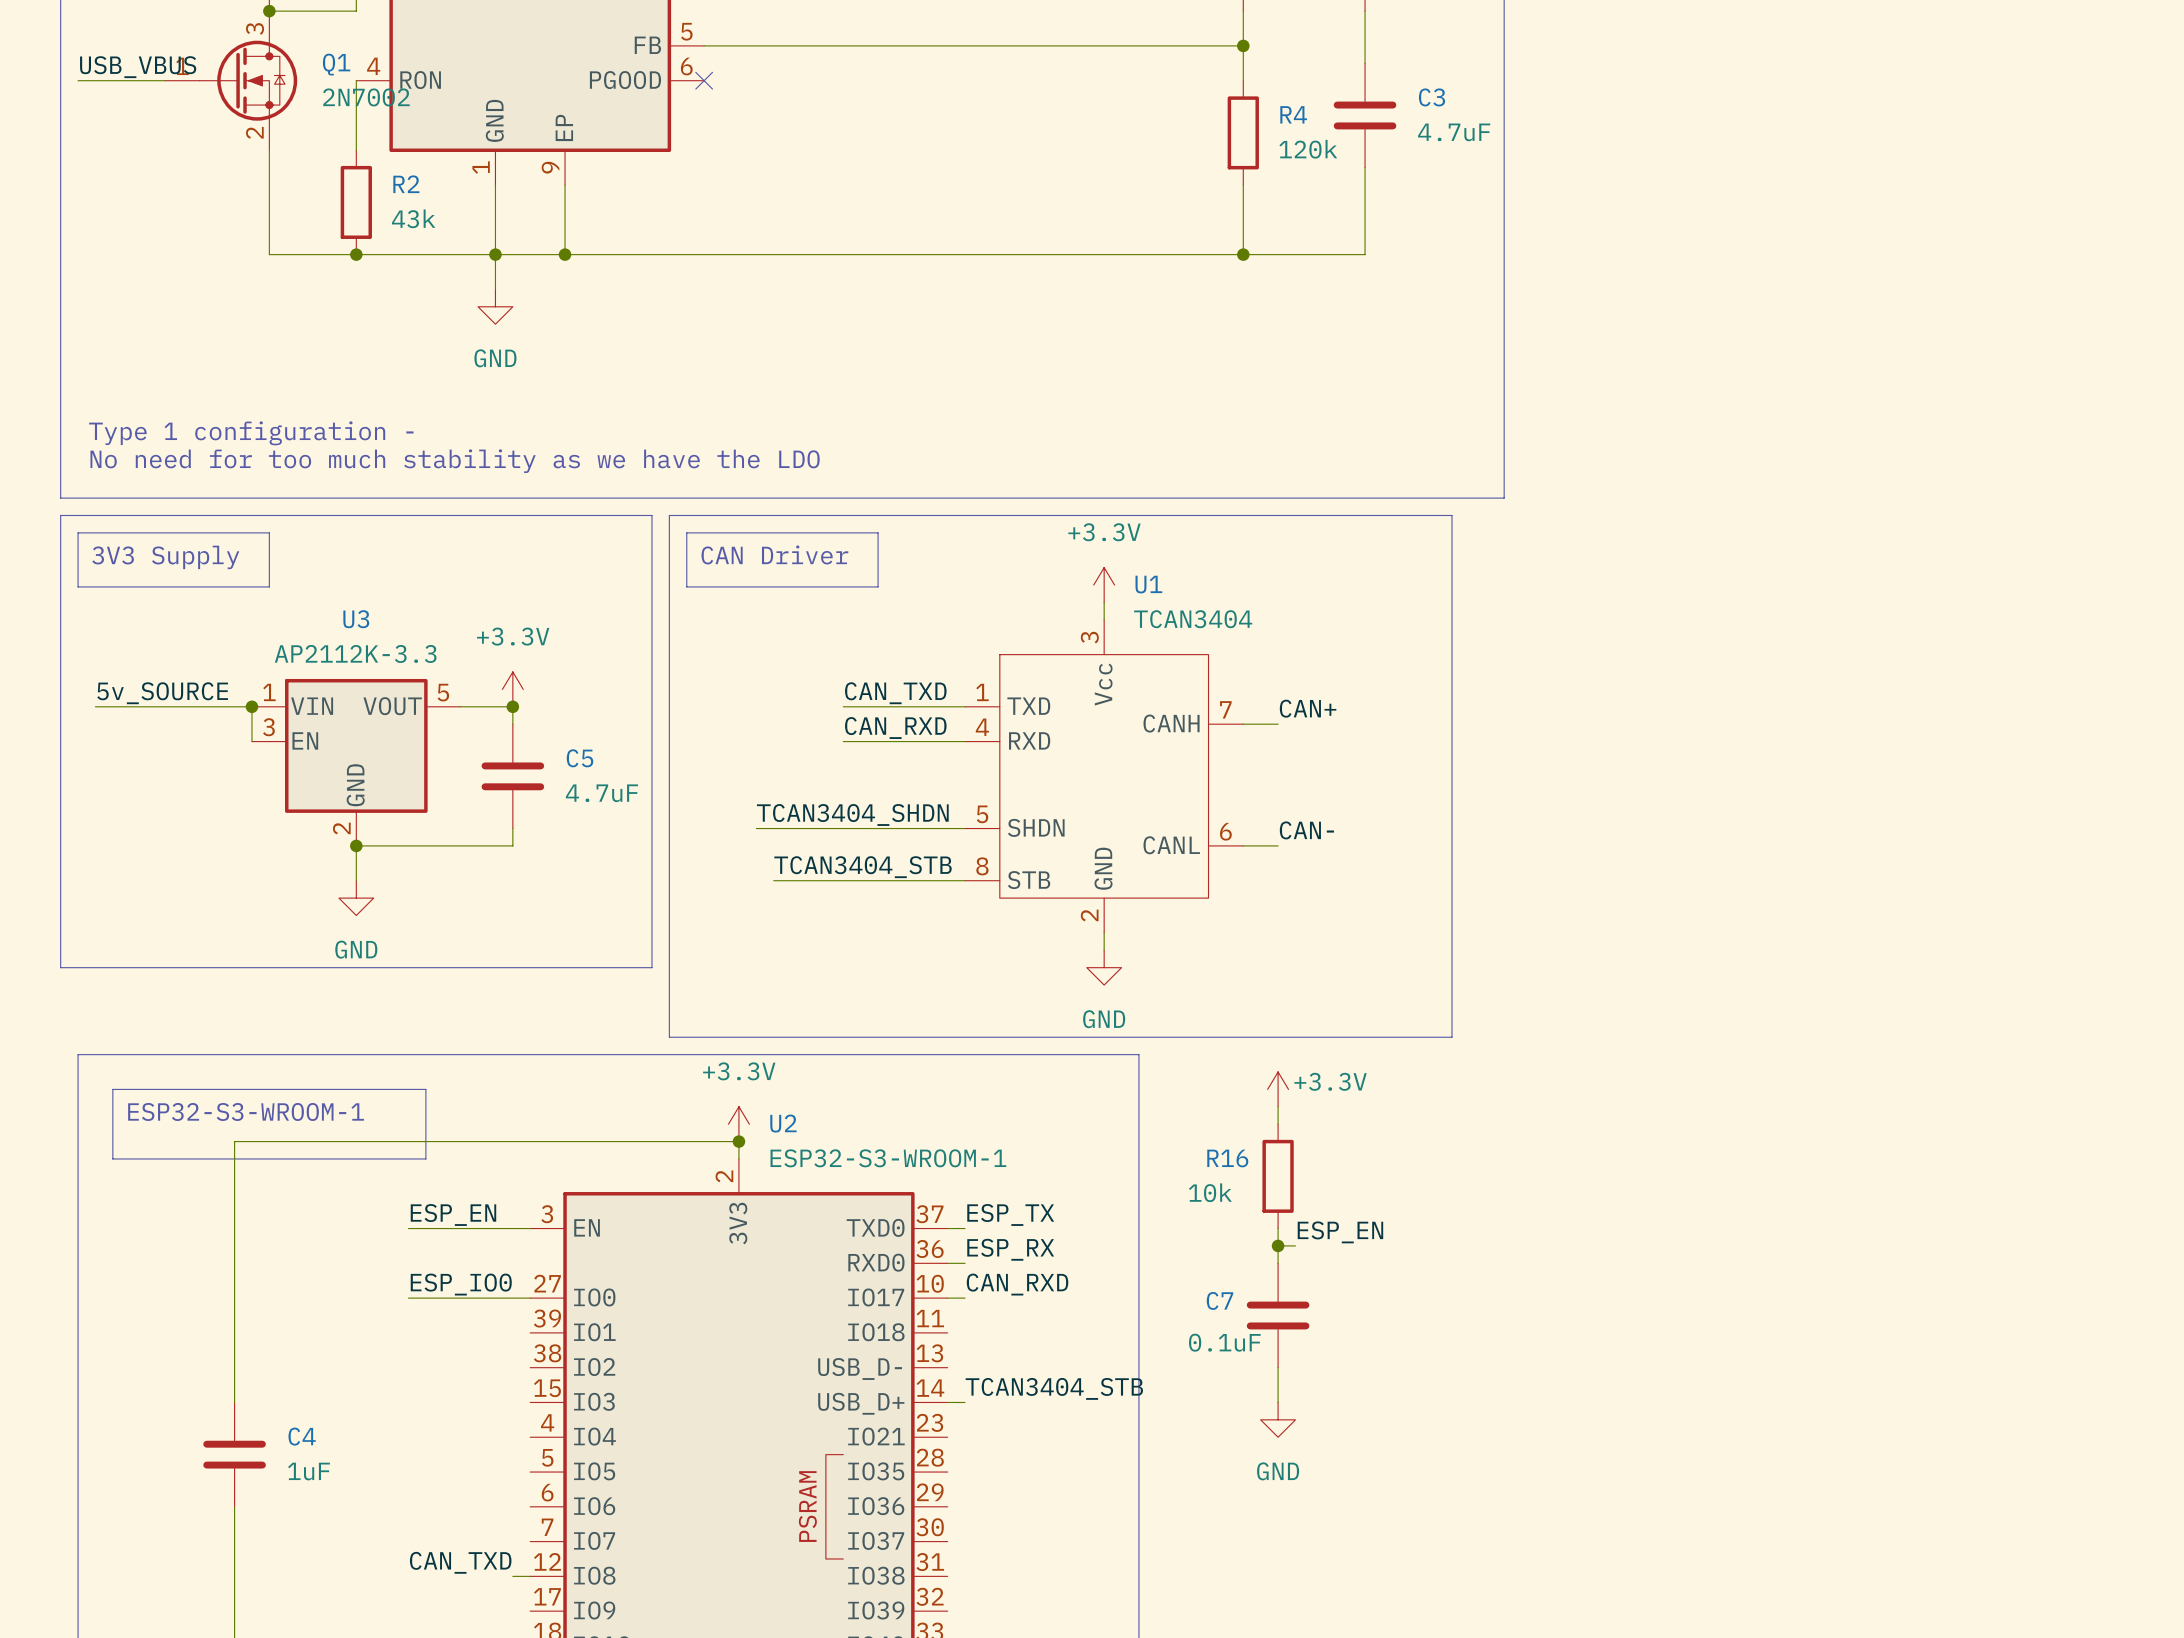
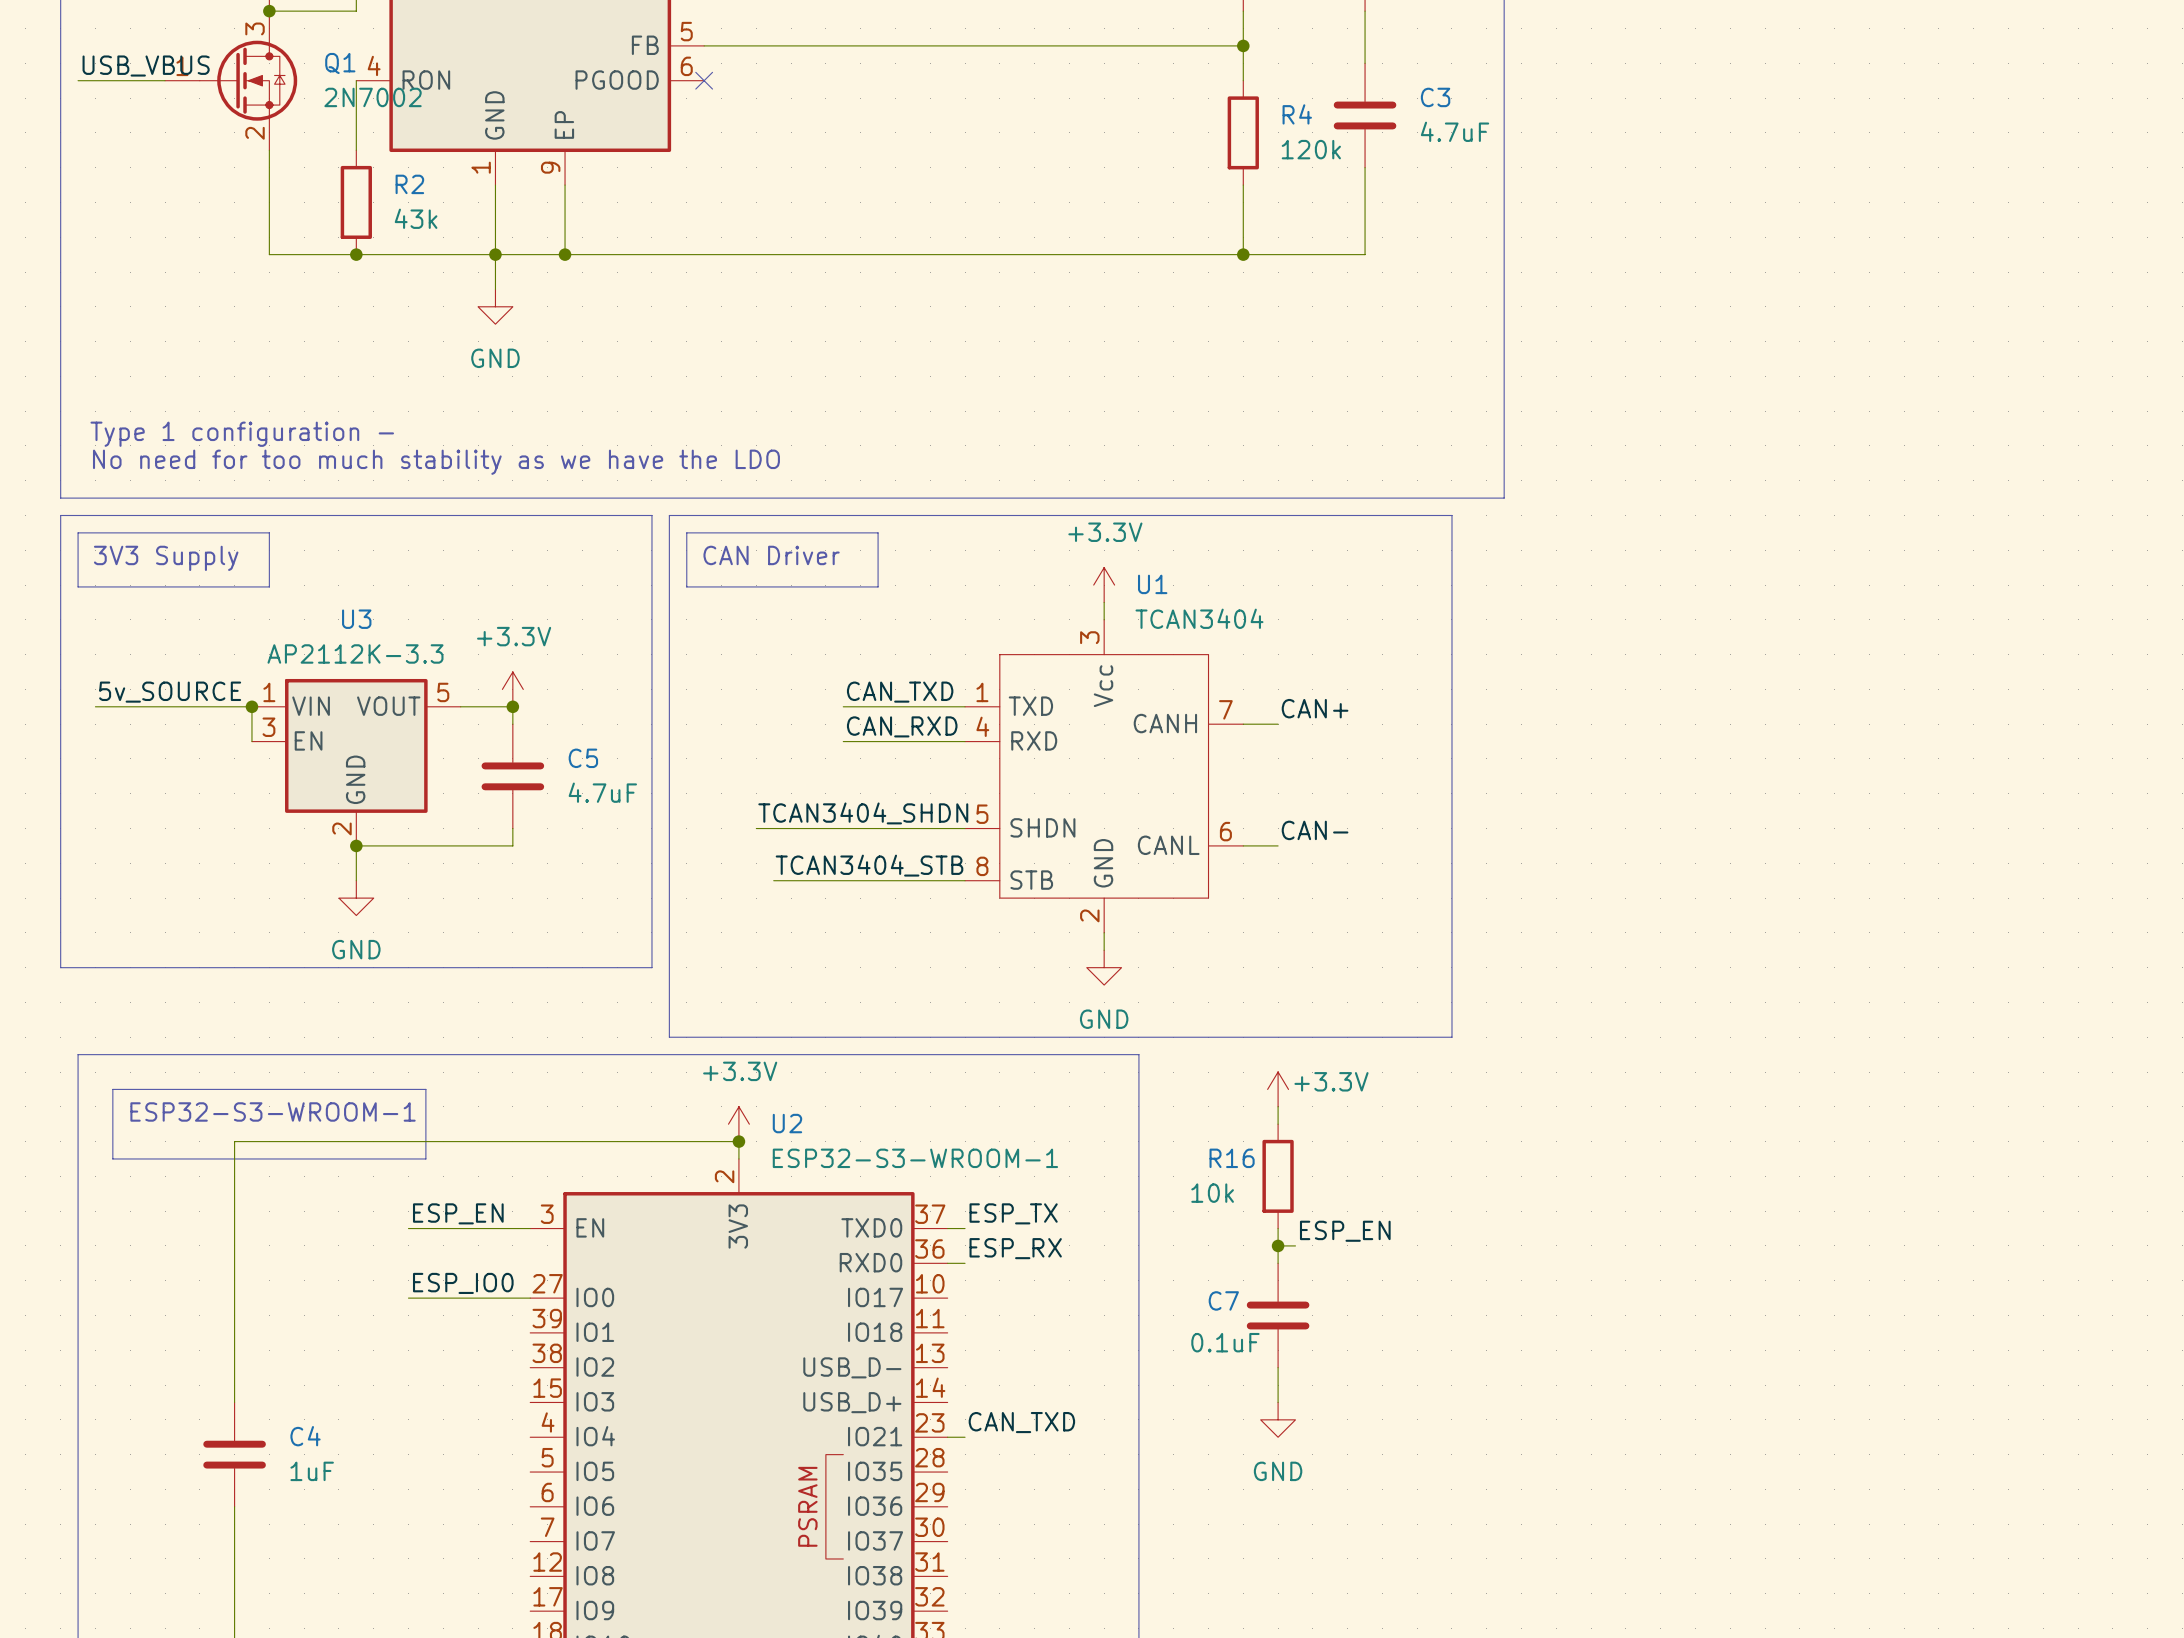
label: CAN_RXD (1017, 1284) -> none
wire: (947, 1298) (965, 1298) -> none
label: TCAN3404_STB (1054, 1388) -> none
wire: (947, 1402) (965, 1402) -> (947, 1437) (965, 1437)
label: none -> CAN_TXD (1021, 1422)
label: CAN_TXD (460, 1562) -> none
wire: (512, 1576) (530, 1576) -> none

